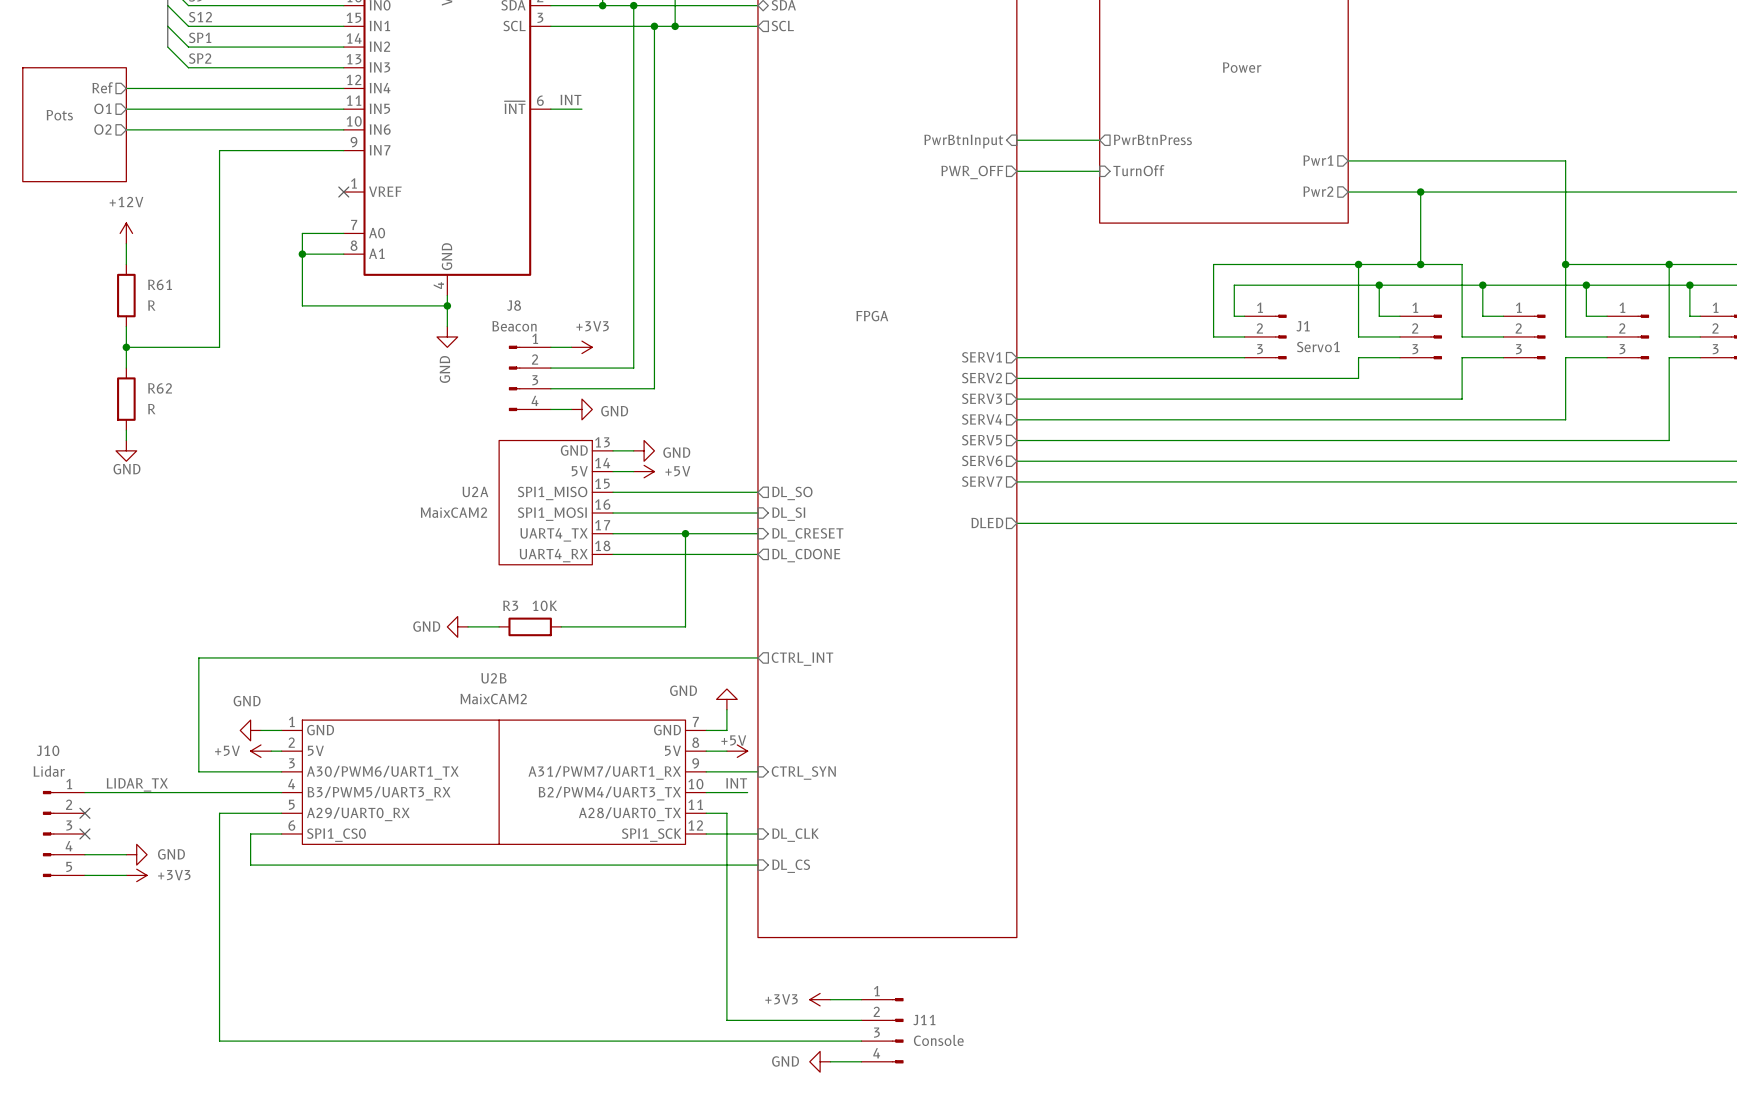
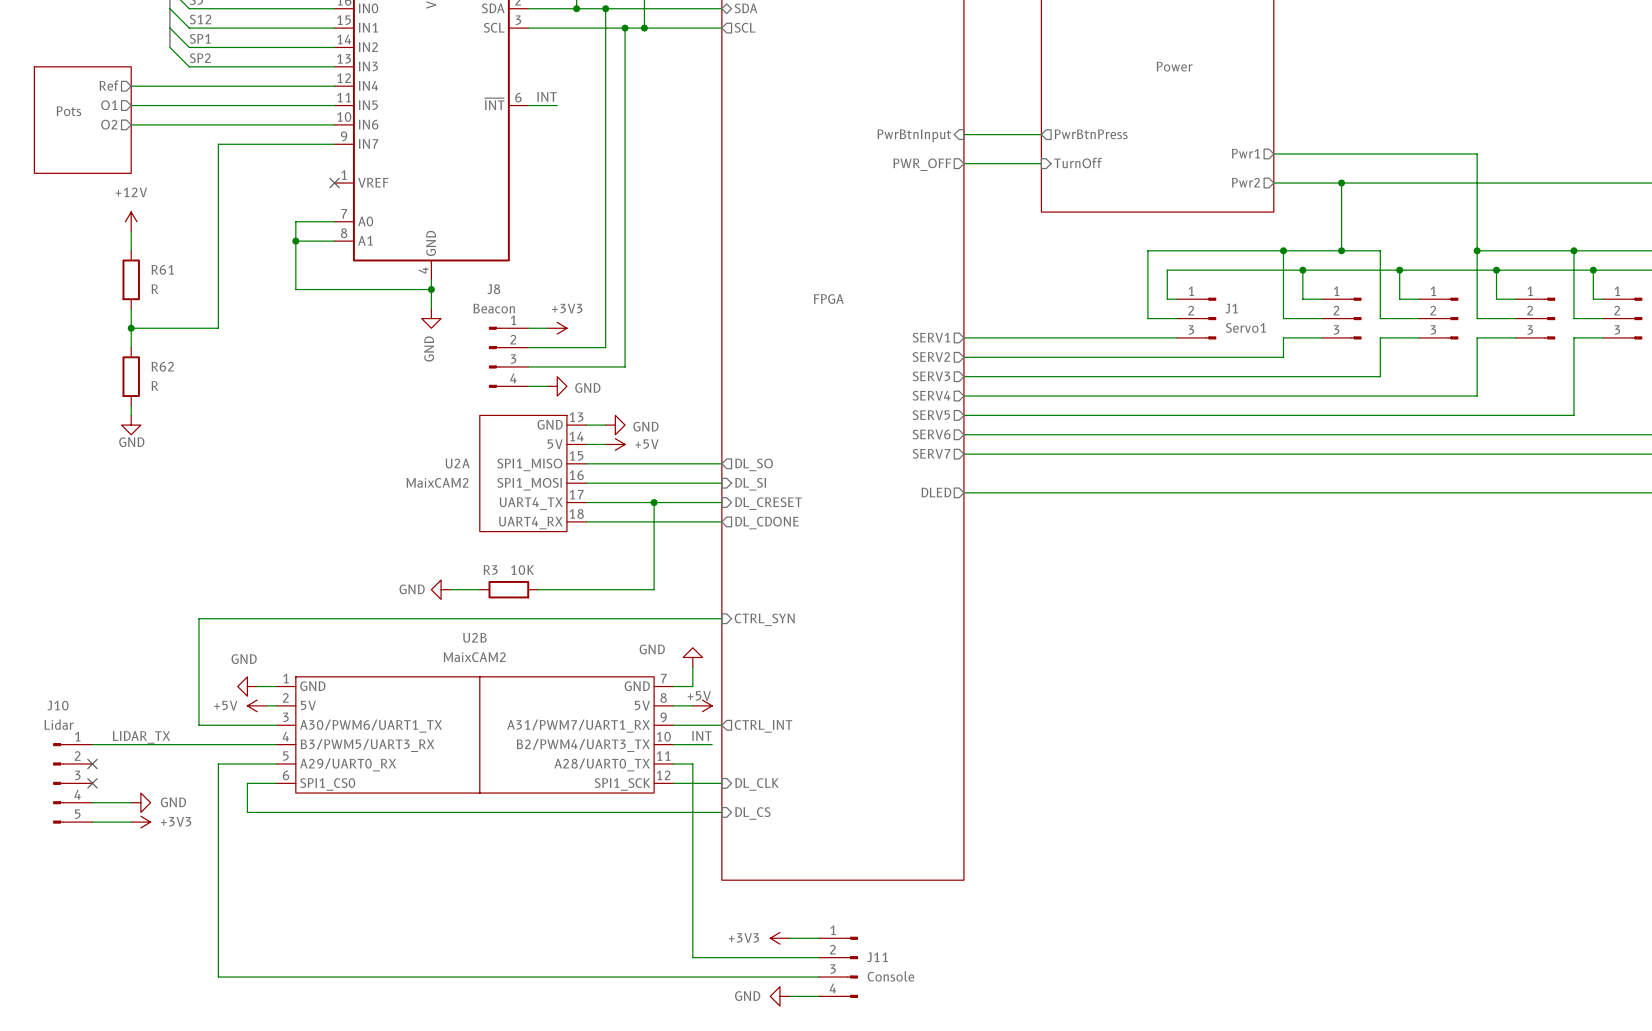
sheet pin shape: output (802, 659) -> input (764, 619)
sheet pin: CTRL_INT (802, 659) -> CTRL_SYN (764, 619)
sheet pin shape: input (803, 773) -> output (763, 726)
sheet pin: CTRL_SYN (803, 773) -> CTRL_INT (763, 726)

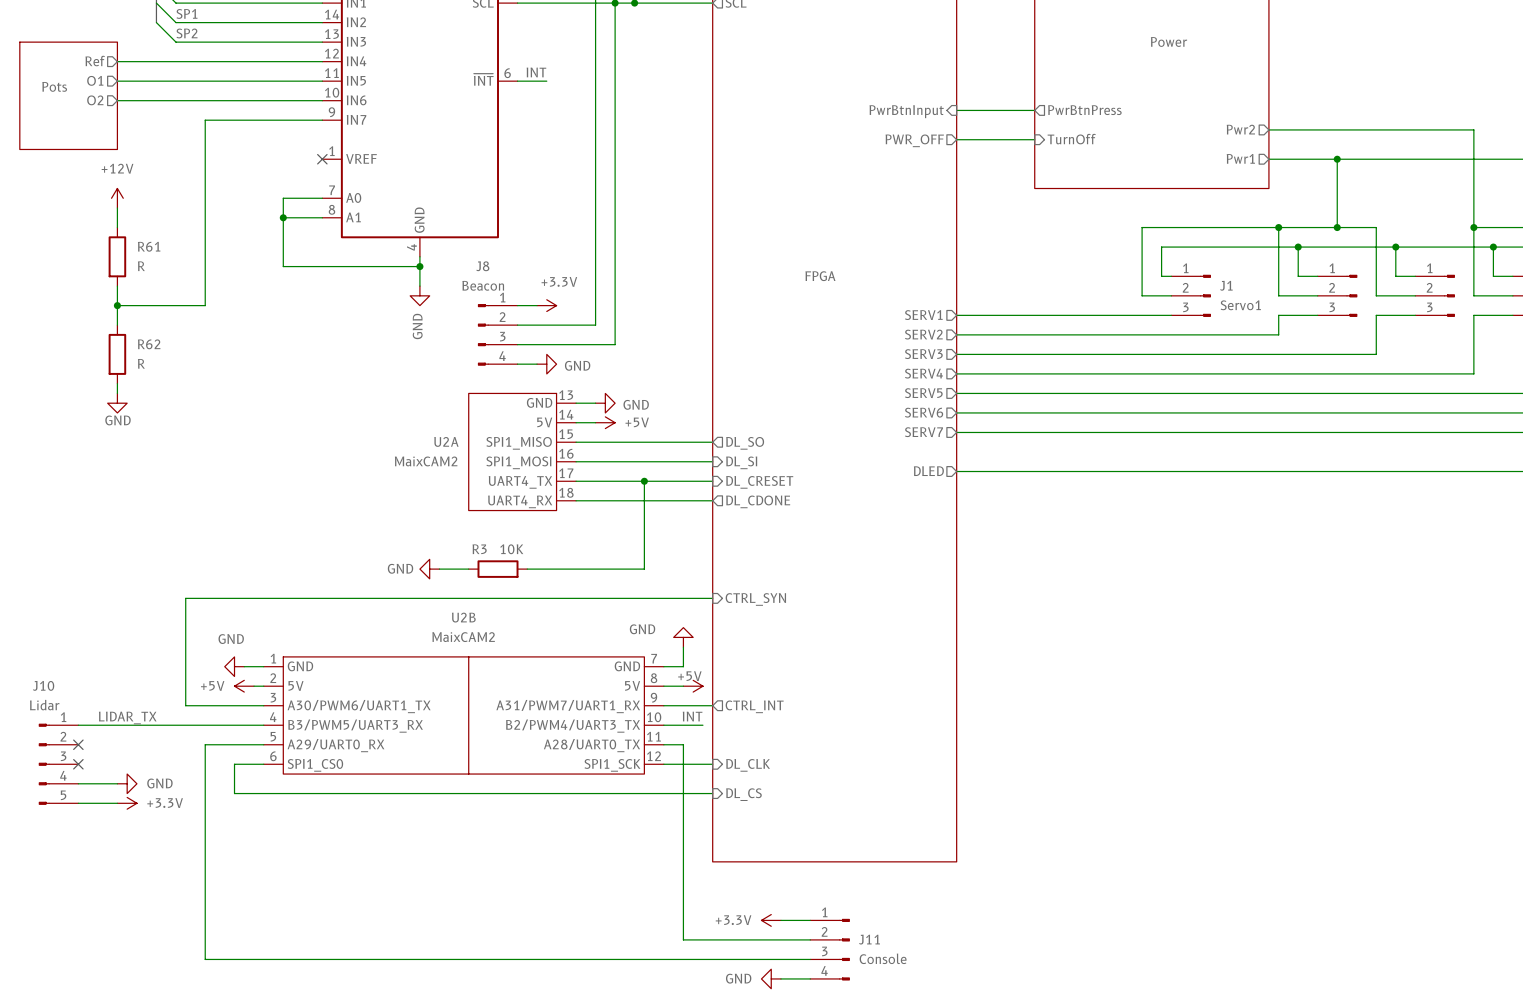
sheet pin: Pwr1 (1245, 153) -> Pwr2 (1240, 129)
sheet pin: Pwr2 (1245, 182) -> Pwr1 (1240, 158)
power symbol: +3V3 (557, 328) -> +3.3V (546, 305)
power symbol: +3V3 (140, 822) -> +3.3V (127, 803)
power symbol: +3V3 (779, 938) -> +3.3V (771, 920)

